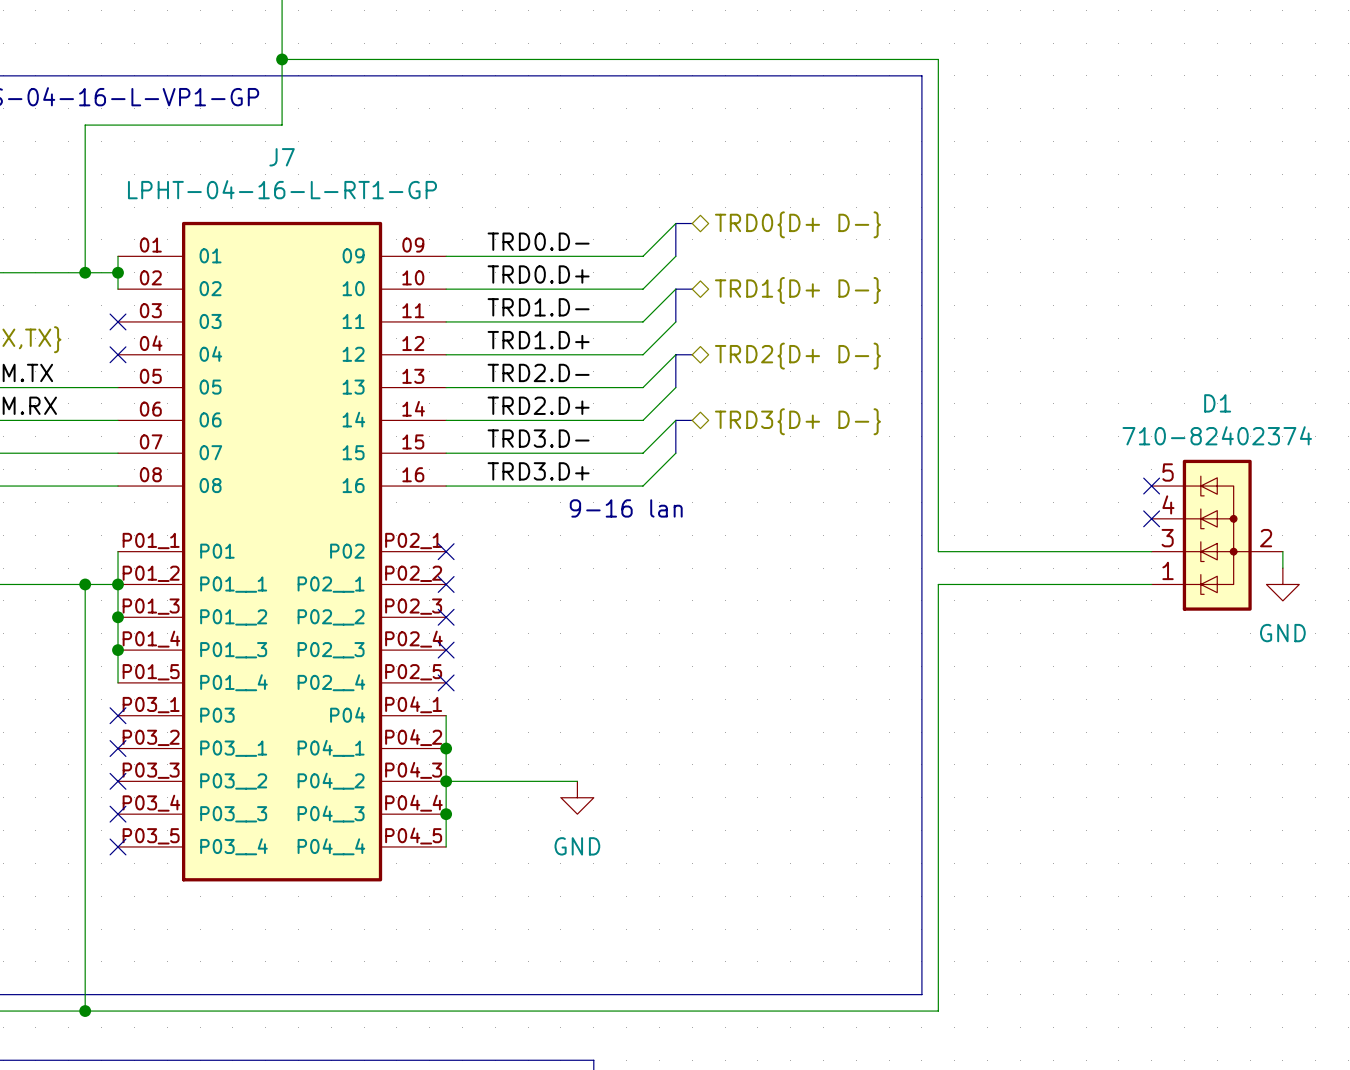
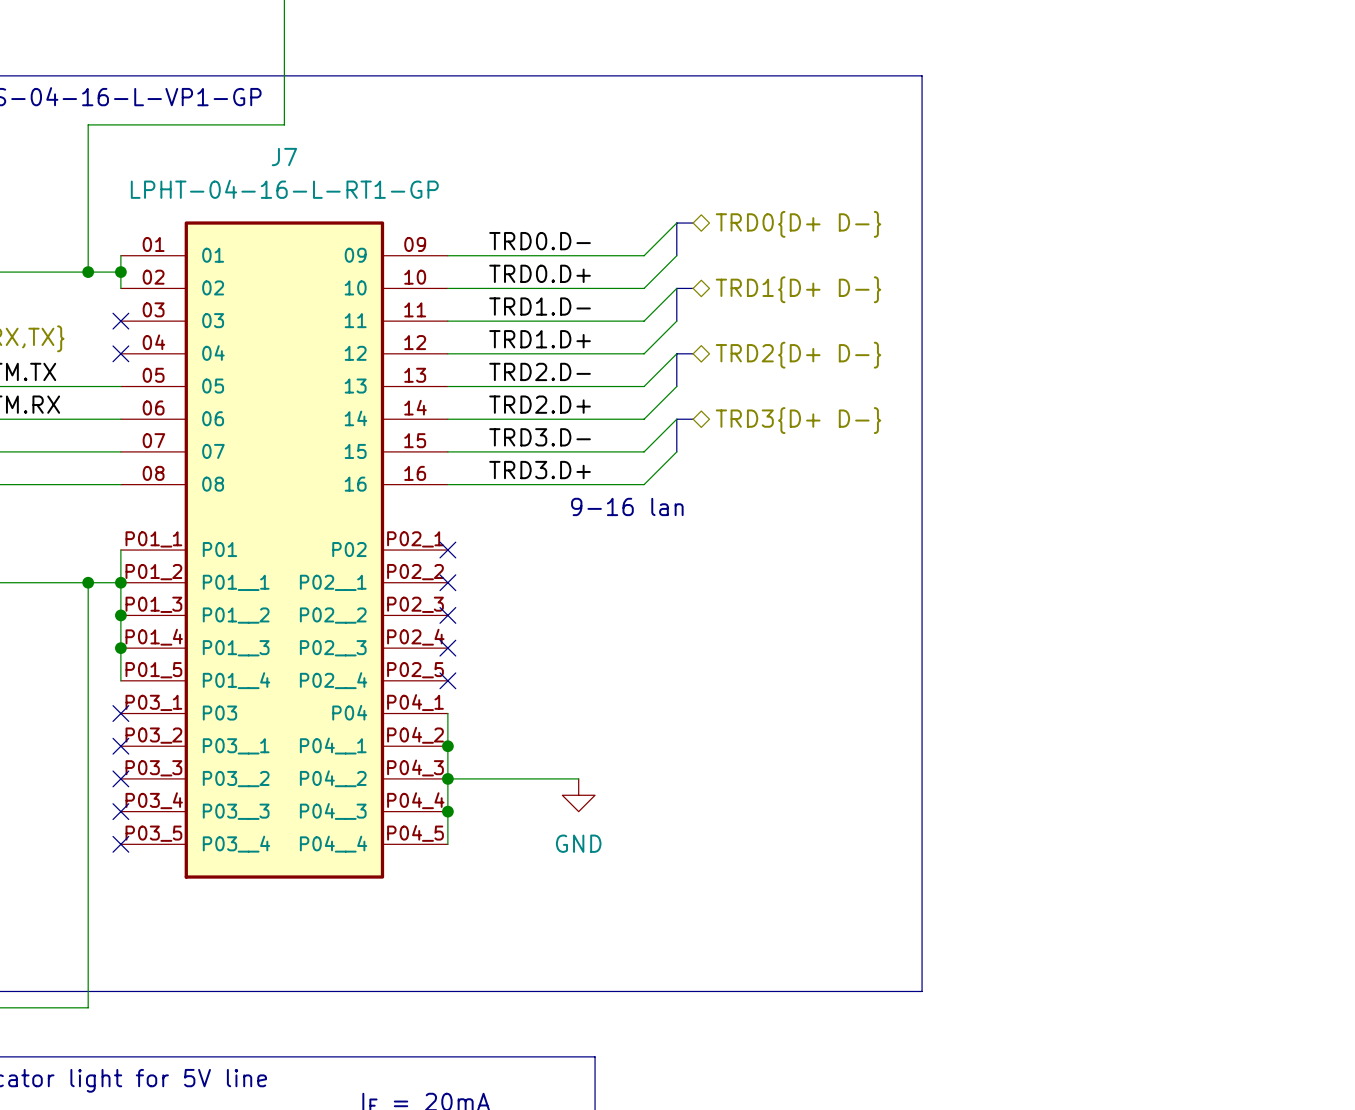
wire: (282, 59) (938, 59) (938, 551) (1151, 551) -> none
junction: (282, 59) -> none
no-connect mark: (1151, 486) -> none
no-connect mark: (1151, 518) -> none
D1: 710-82402374 (1217, 535) -> none
wire: (1282, 551) (1282, 568) -> none
wire: (1151, 584) (938, 584) (938, 1011) (85, 1011) -> none
power symbol: GND (1282, 584) -> none
junction: (85, 1011) -> none

